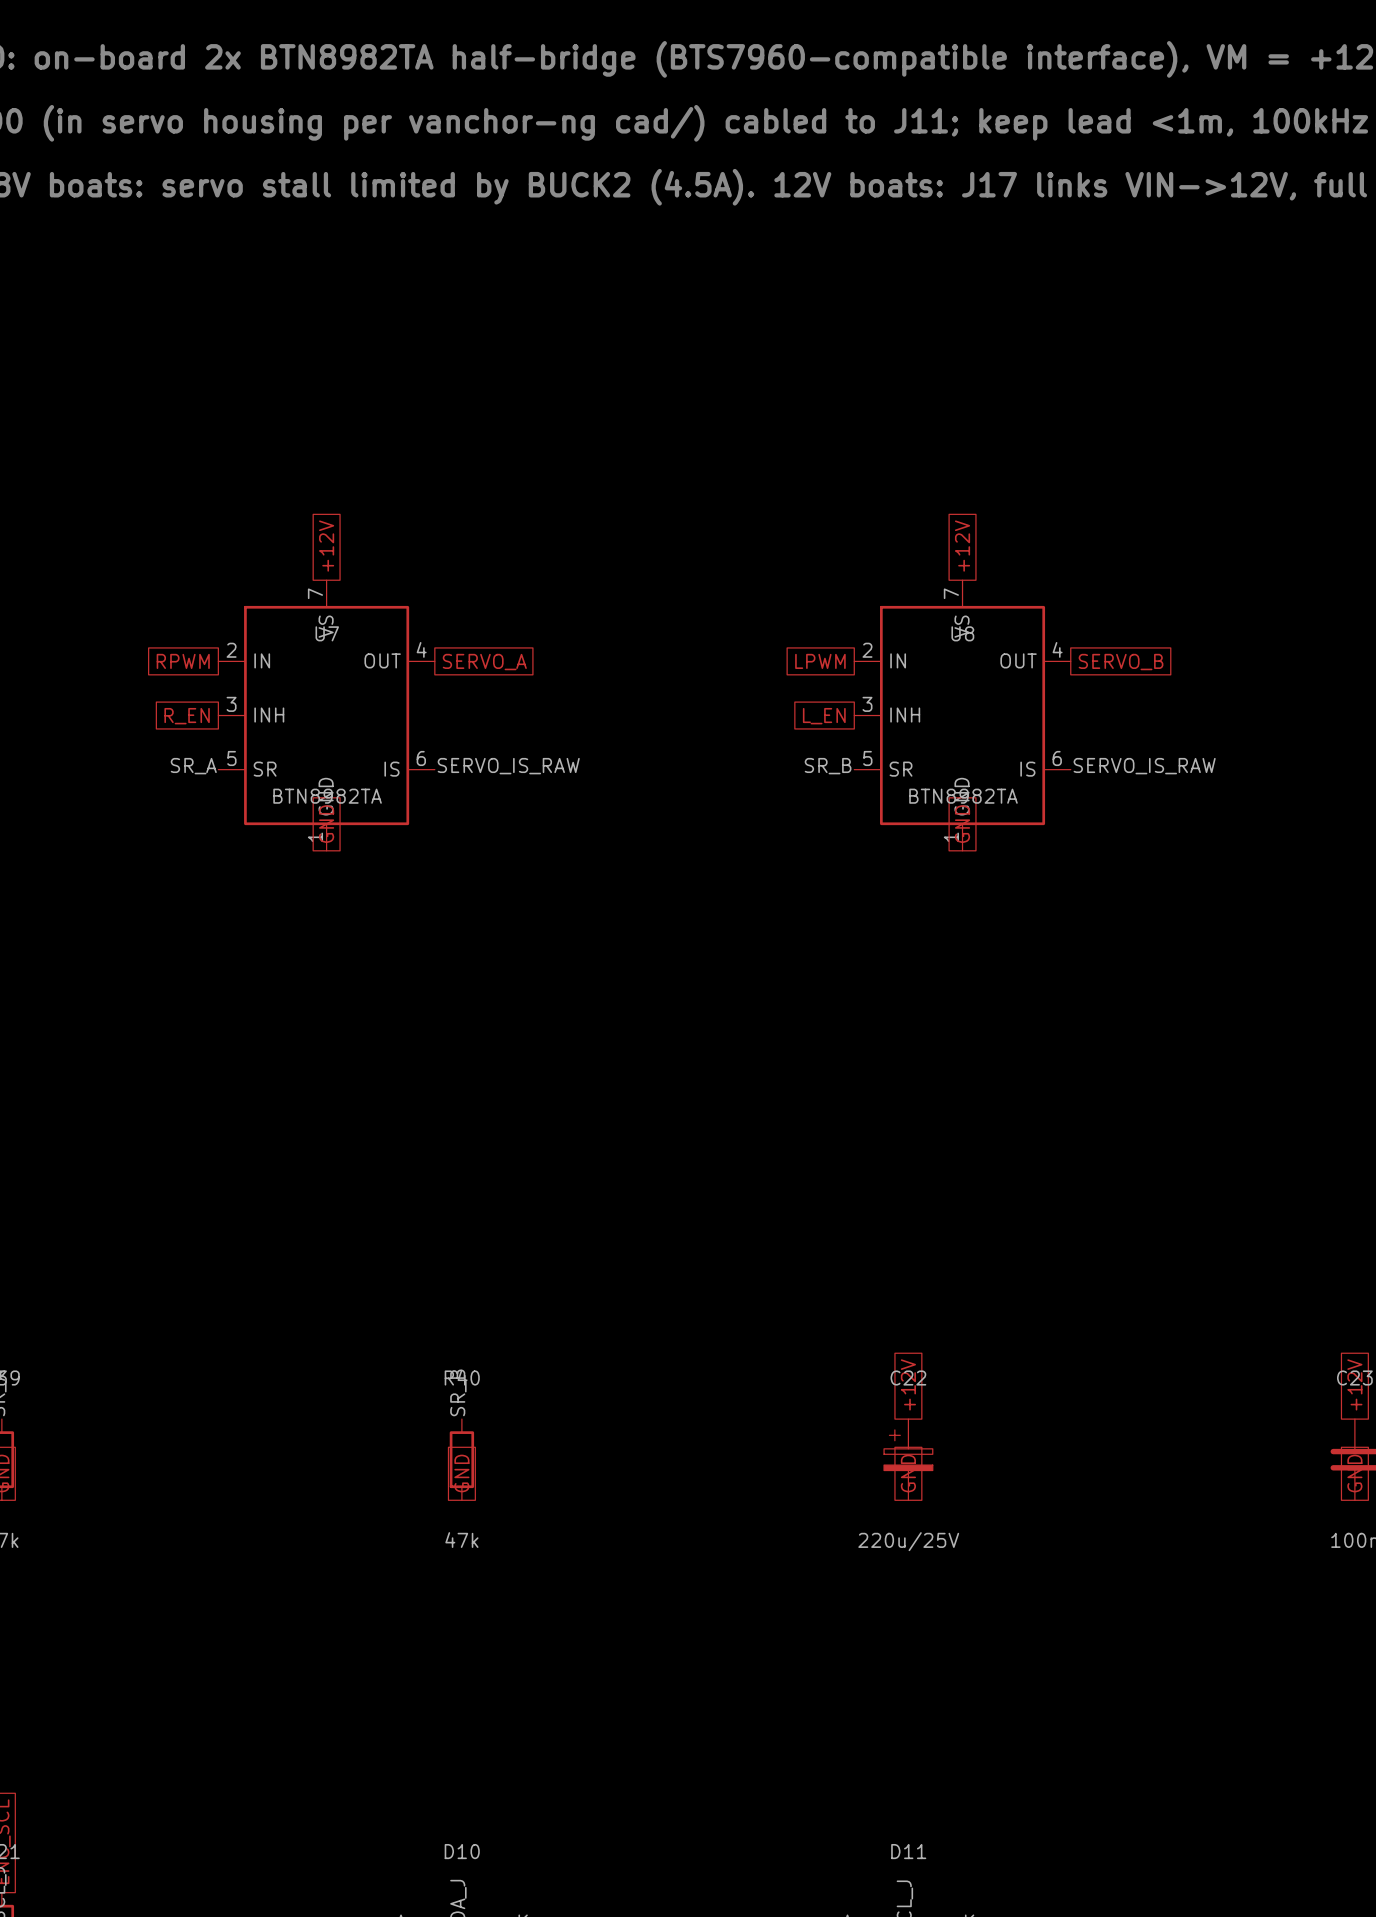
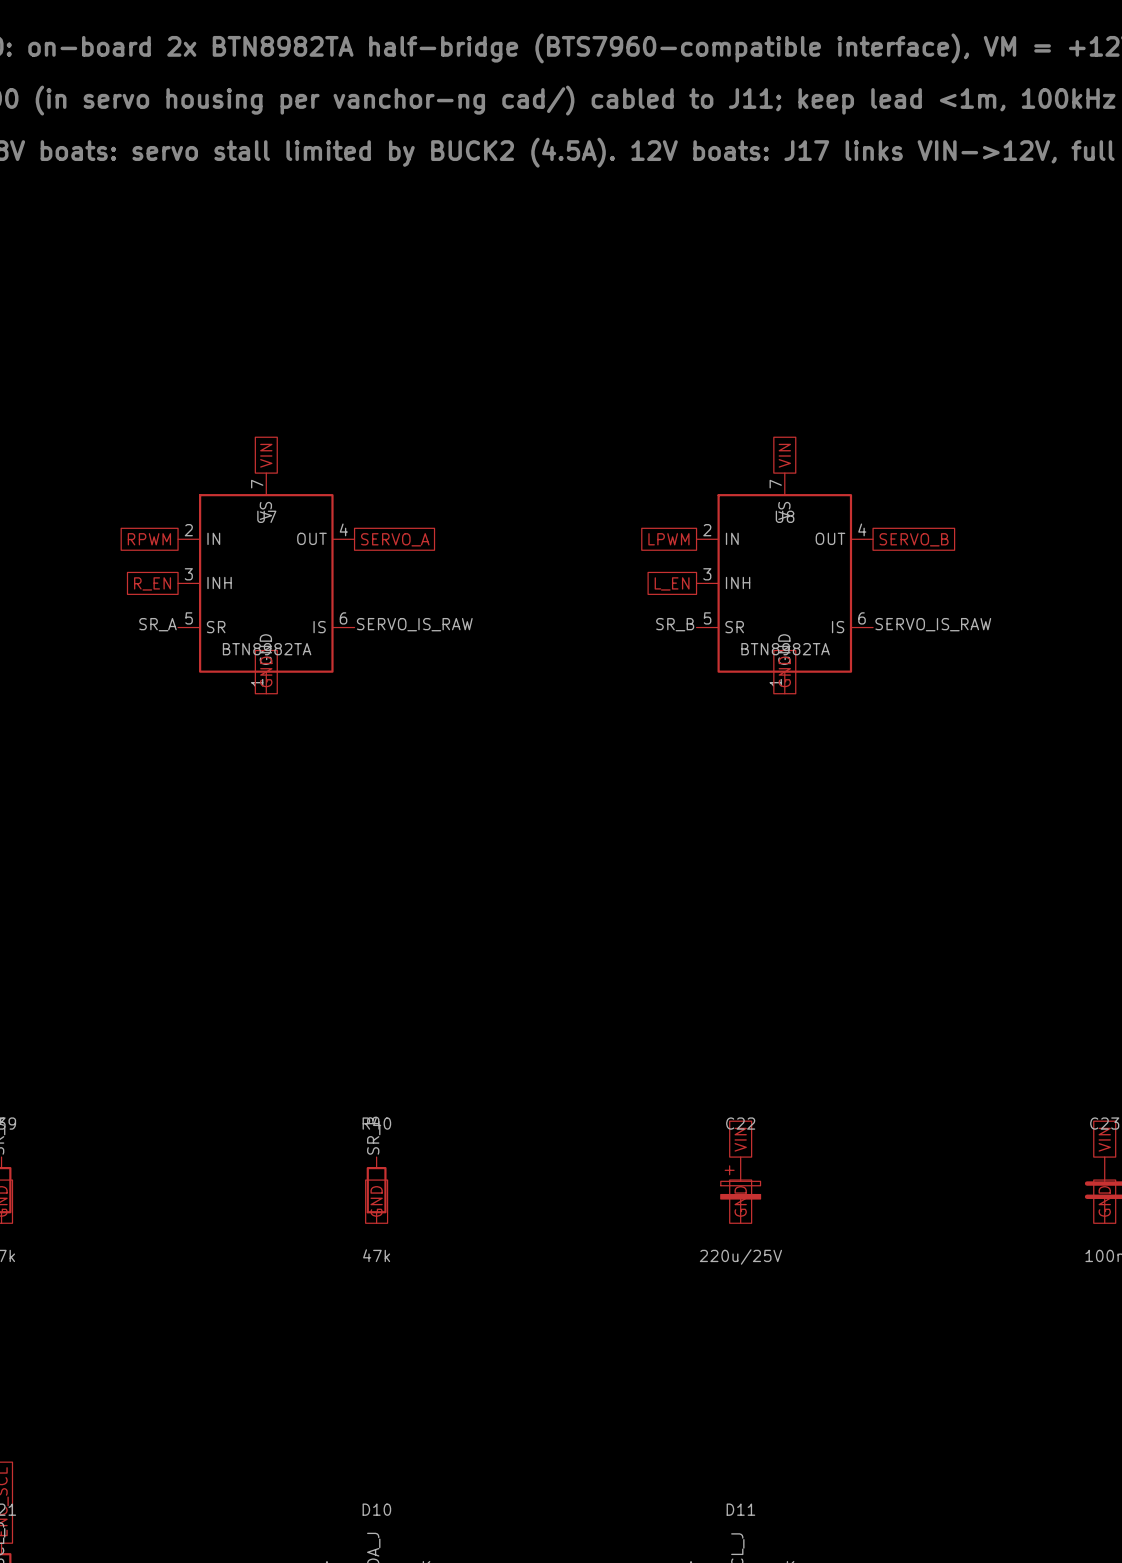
global label: +12V (326, 546) -> VIN (266, 455)
global label: +12V (962, 546) -> VIN (784, 455)
global label: +12V (908, 1384) -> VIN (740, 1139)
global label: +12V (1354, 1384) -> VIN (1104, 1139)

